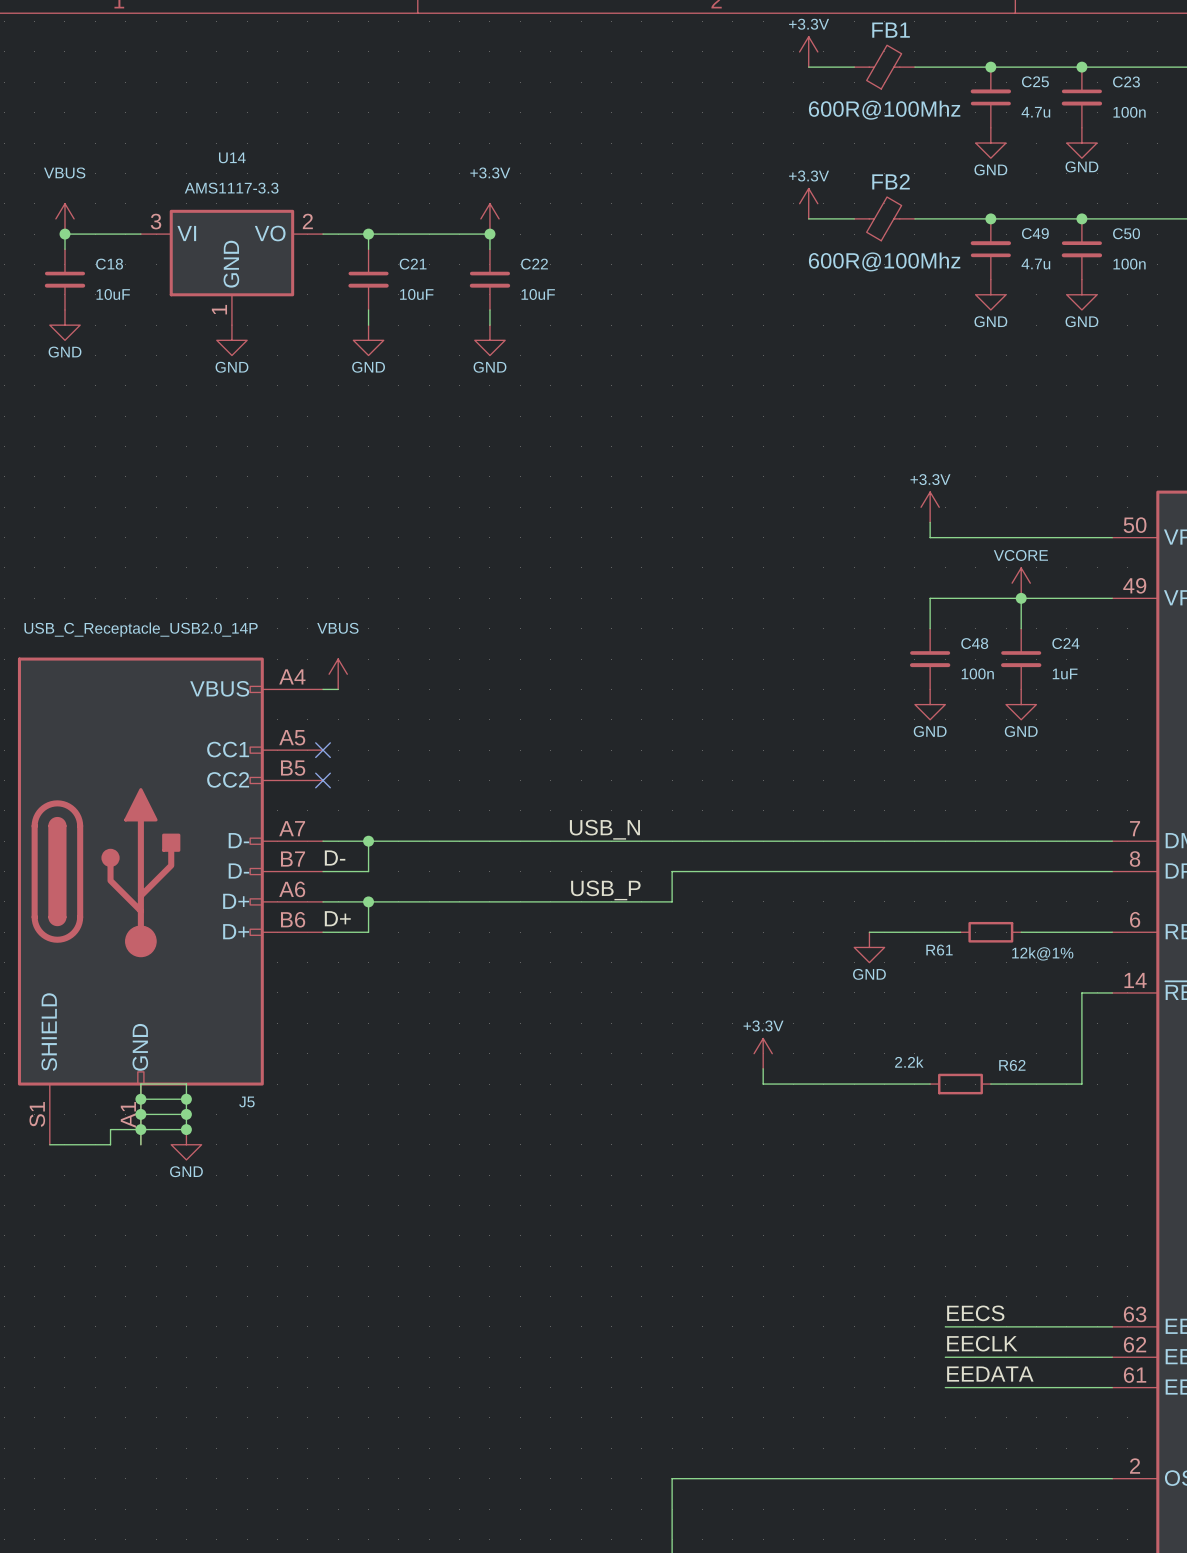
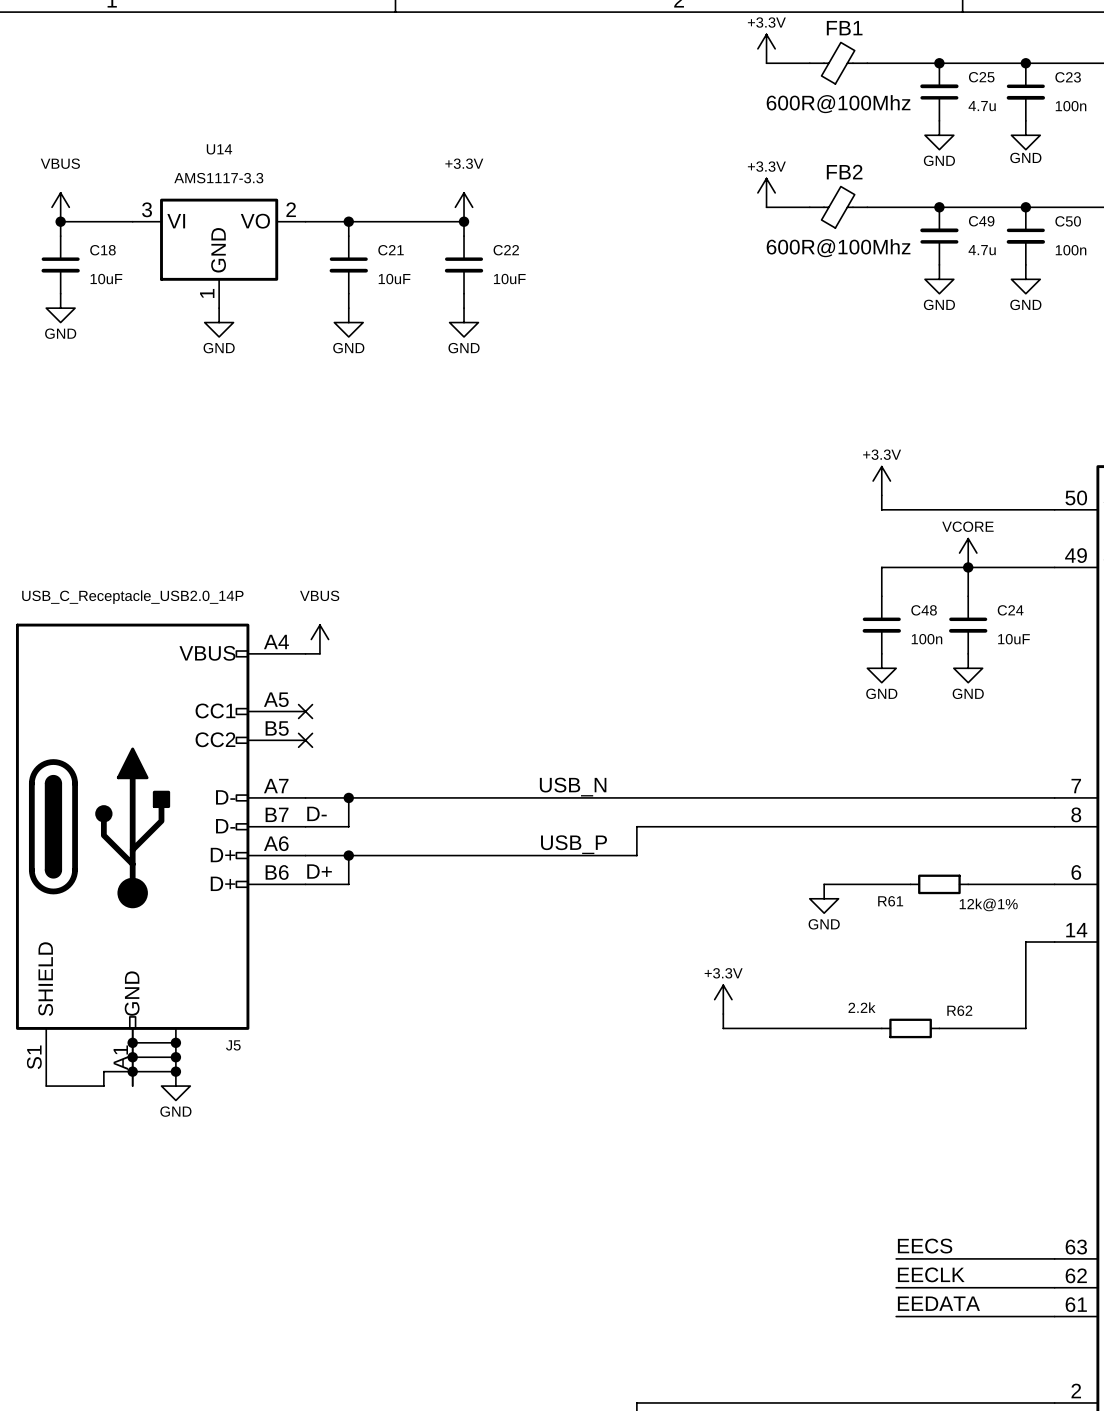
C24 value: 1uF (1065, 673) -> 10uF (1013, 639)

